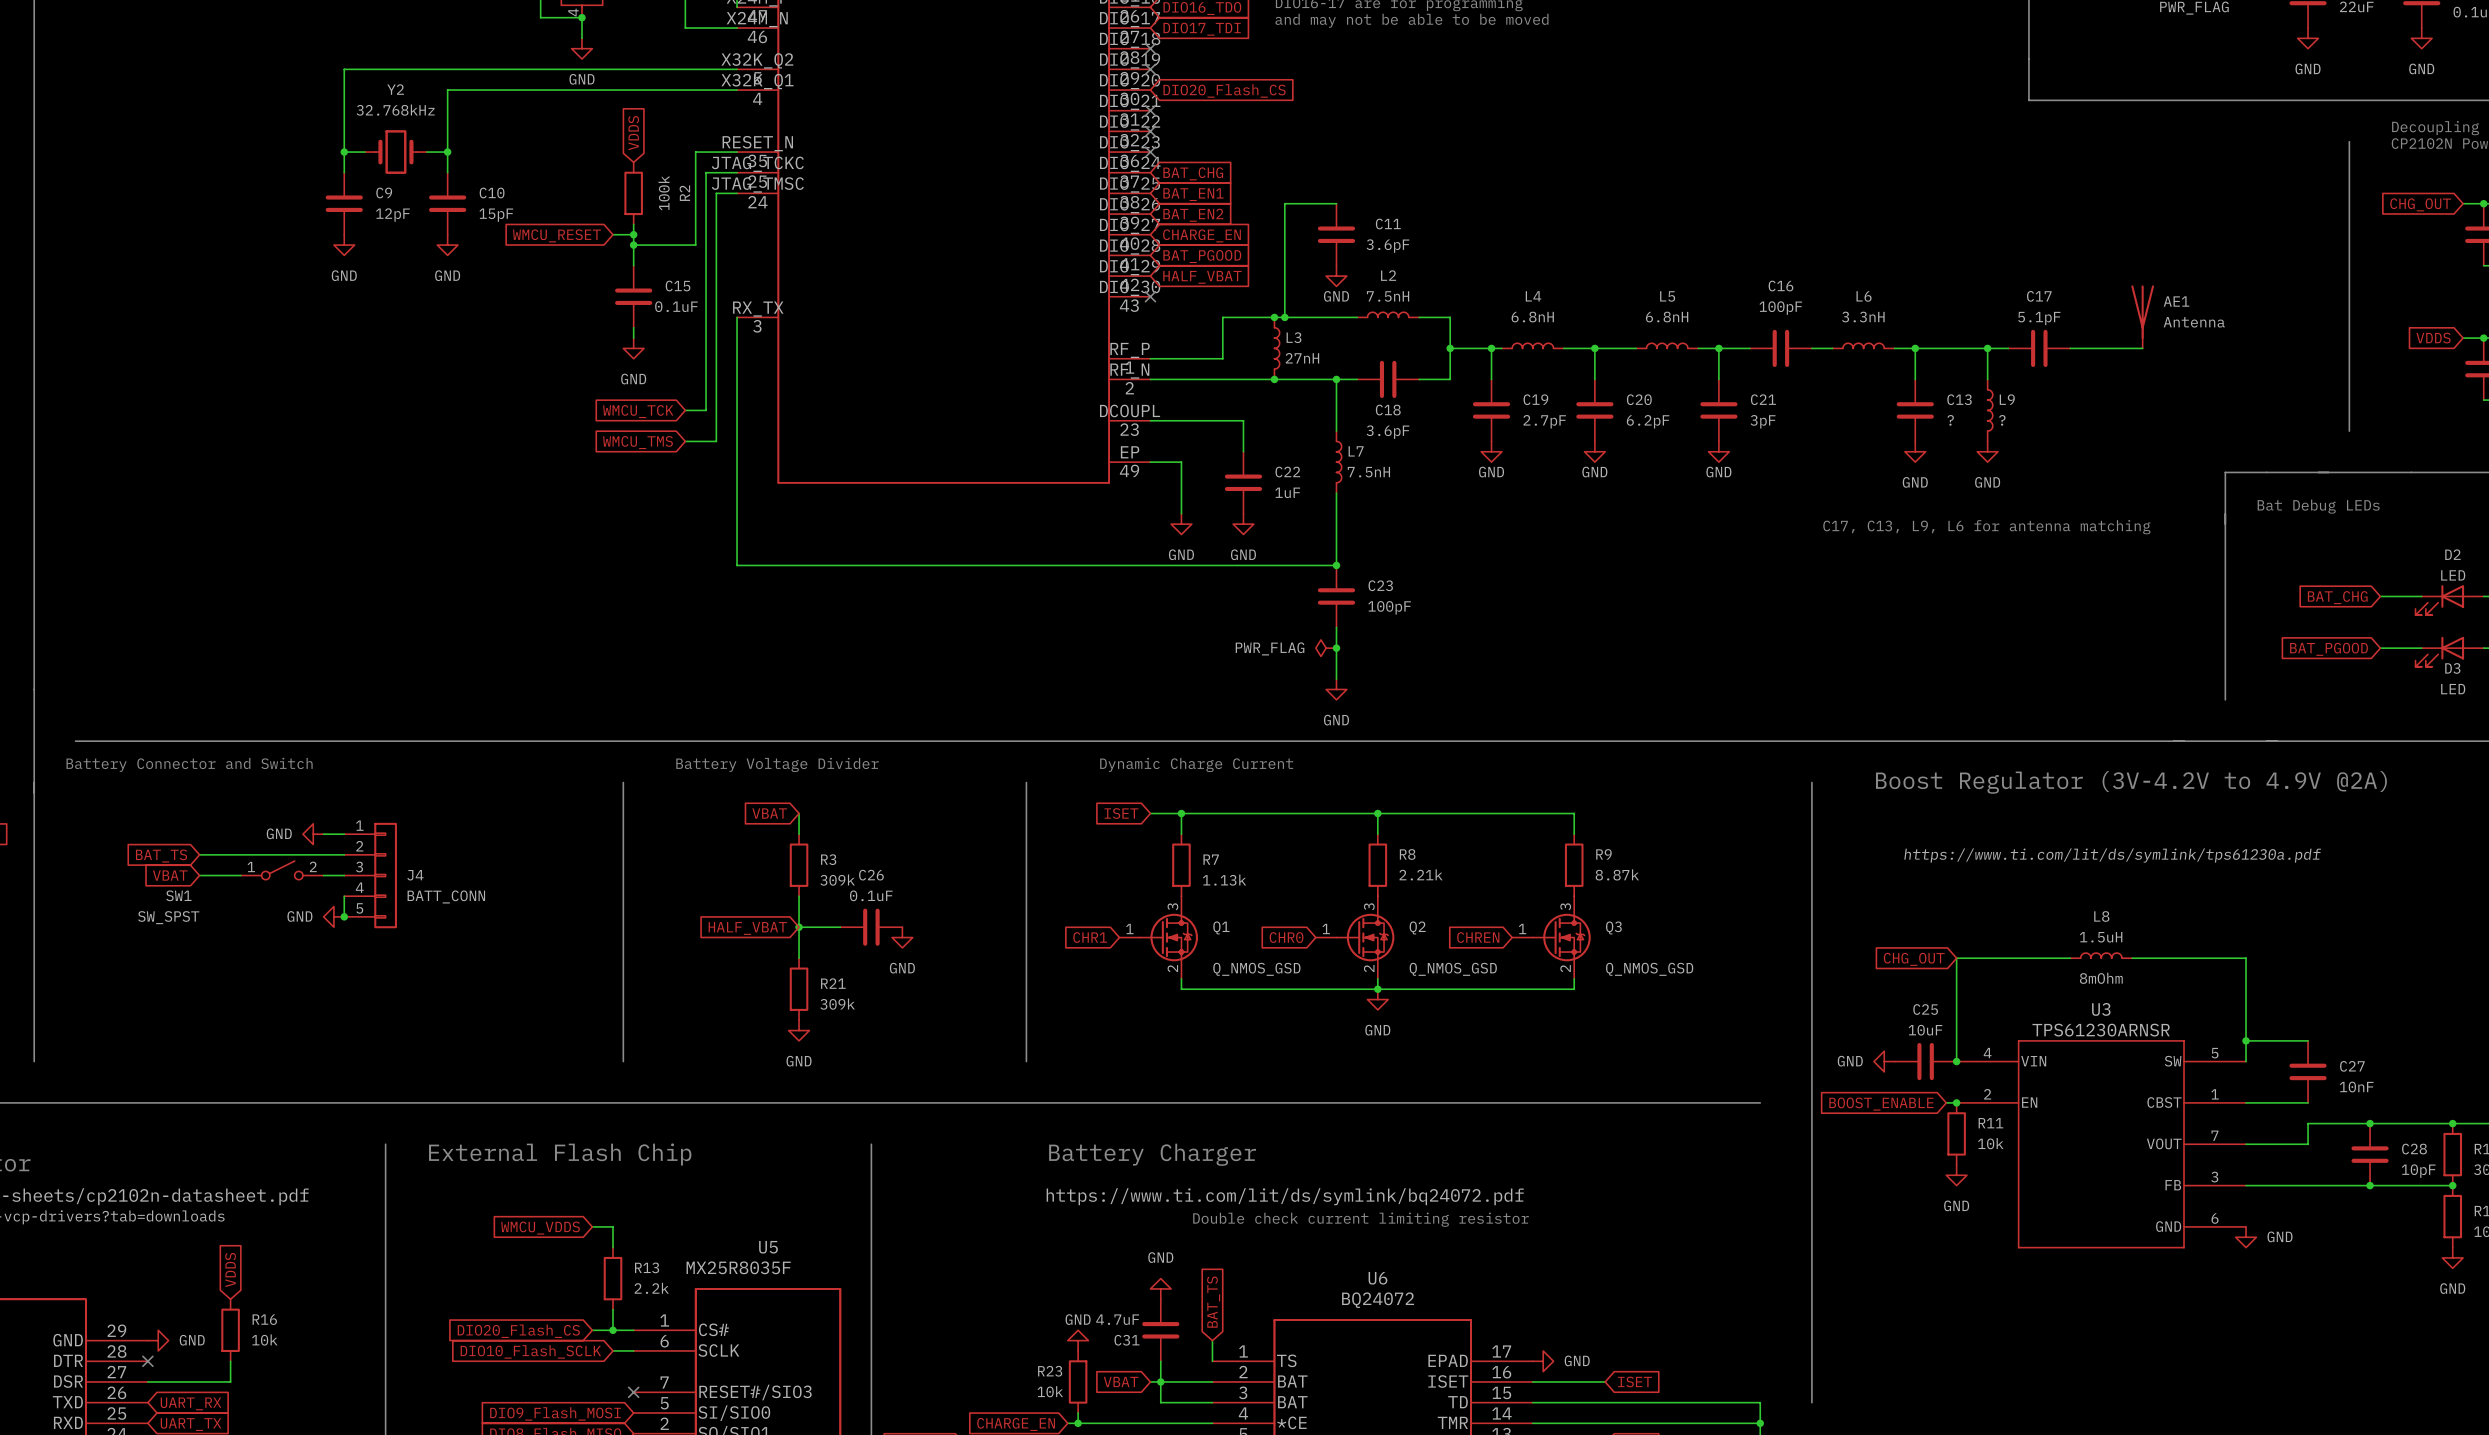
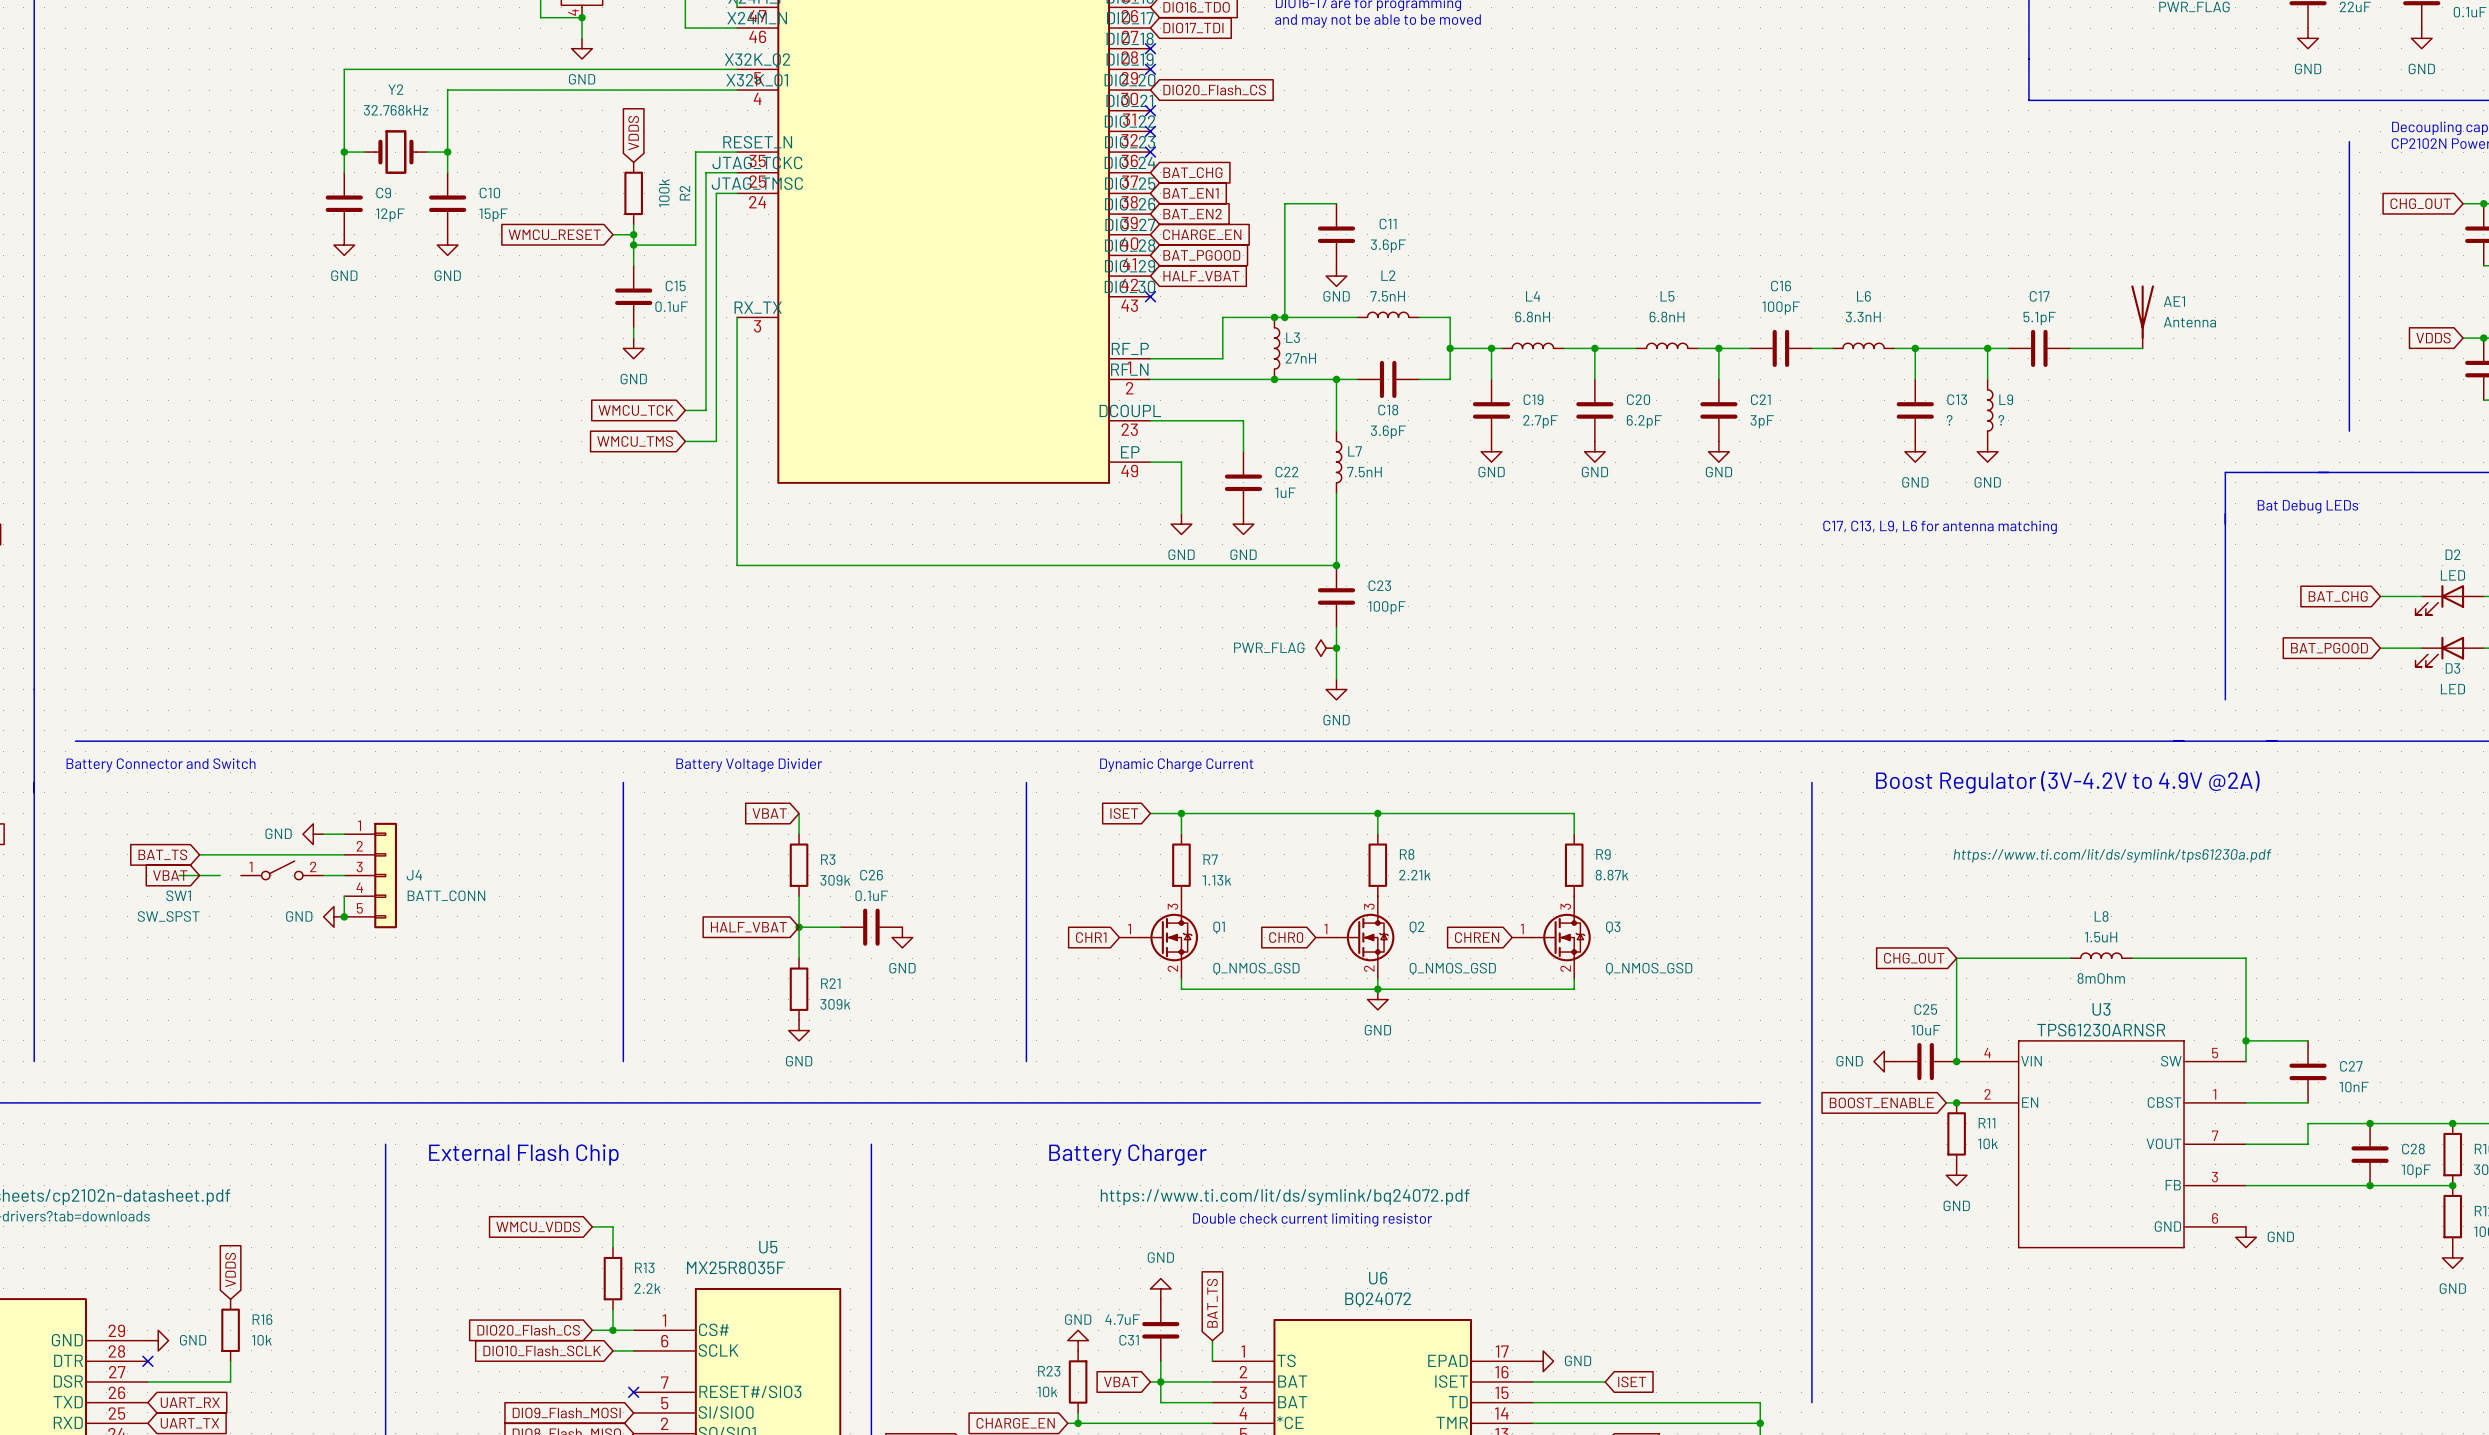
wire: (220, 875) (240, 875) -> (178, 875) (199, 875)

